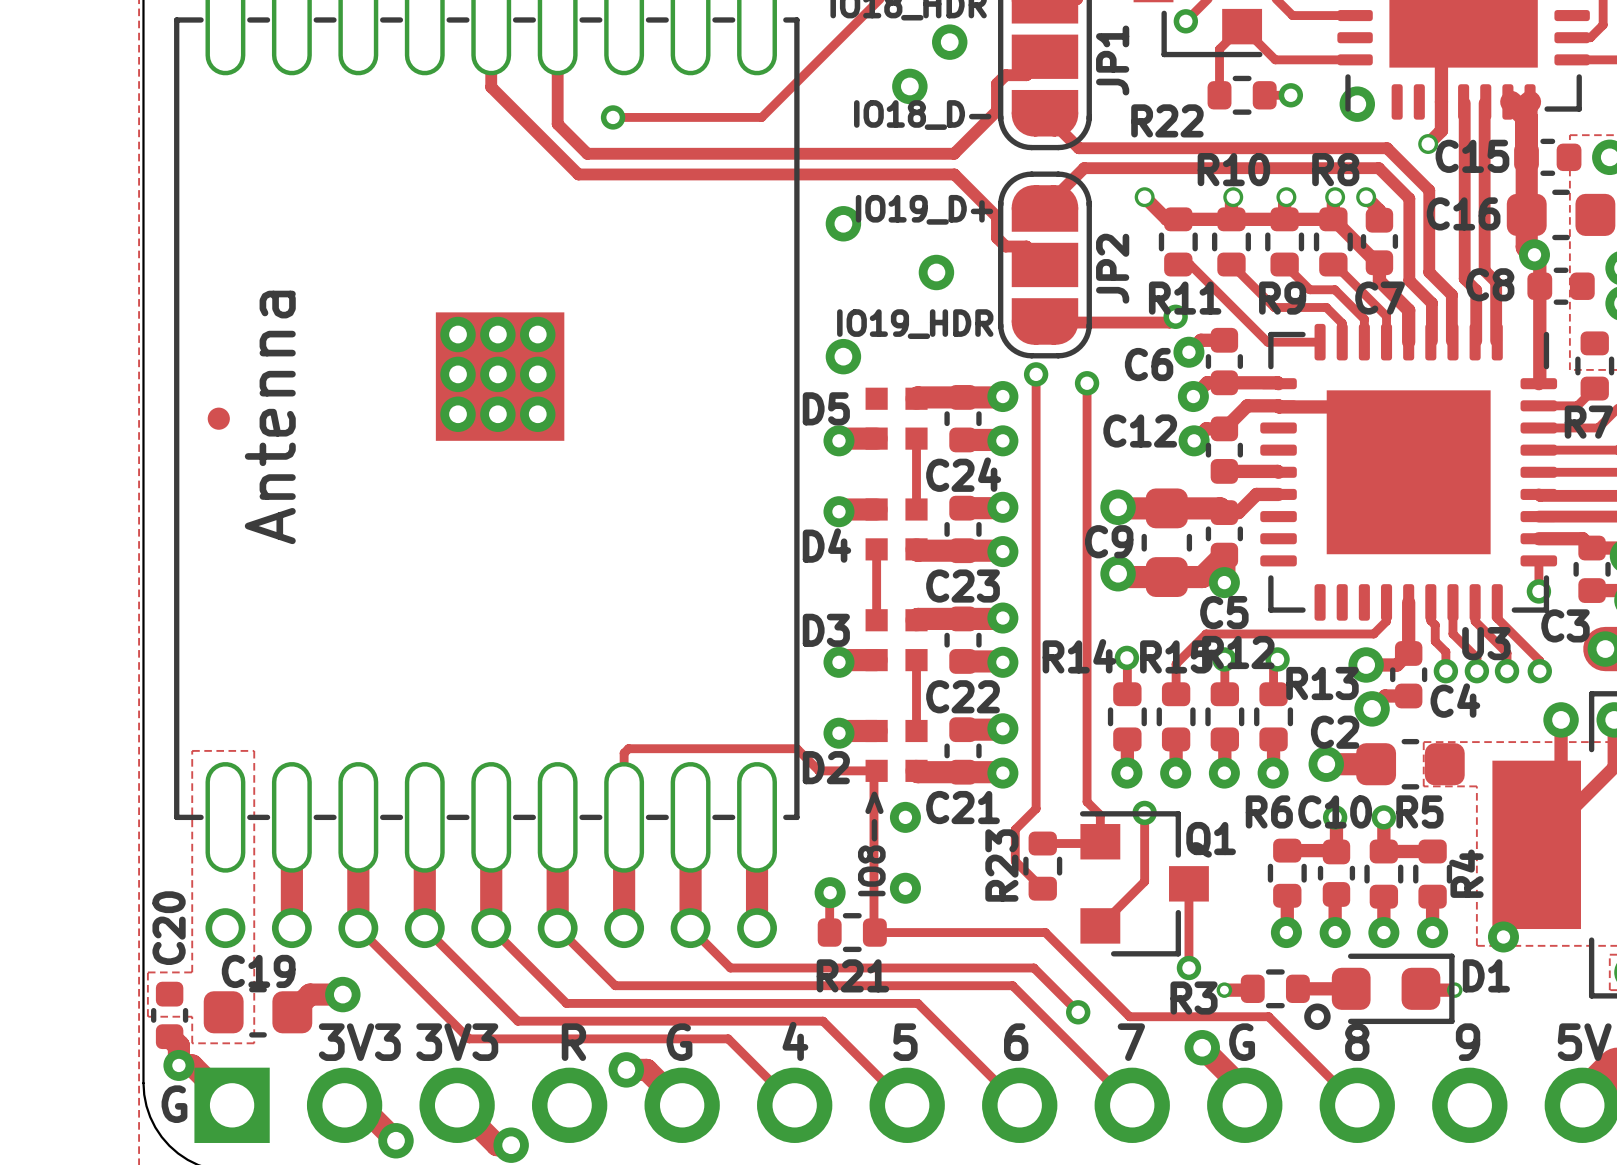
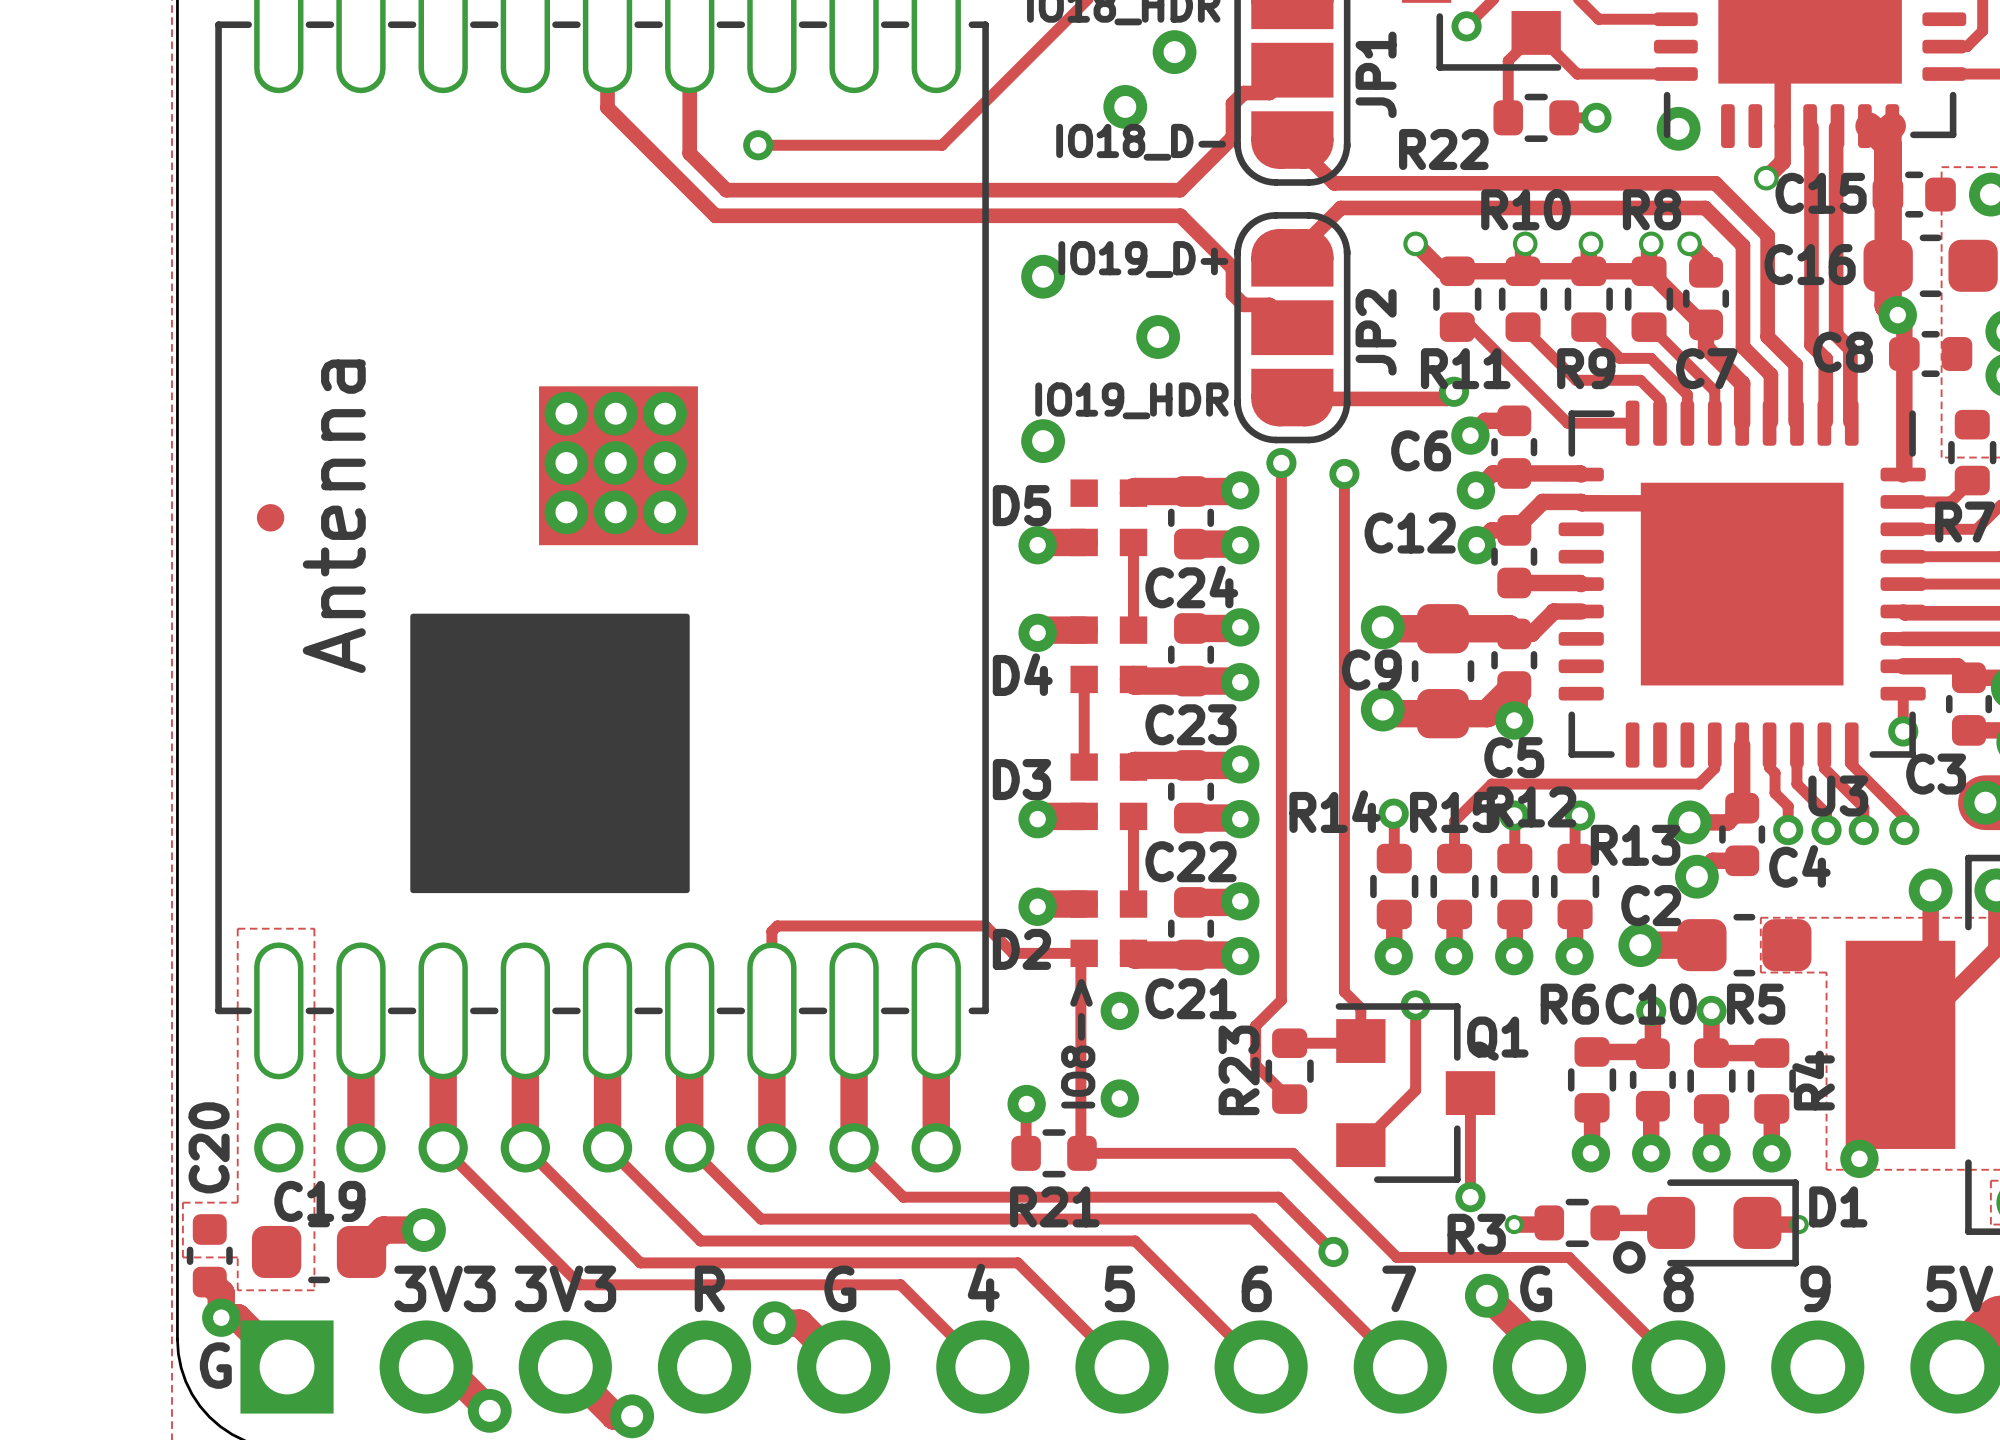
drawing: none -> [410, 613, 690, 894]

